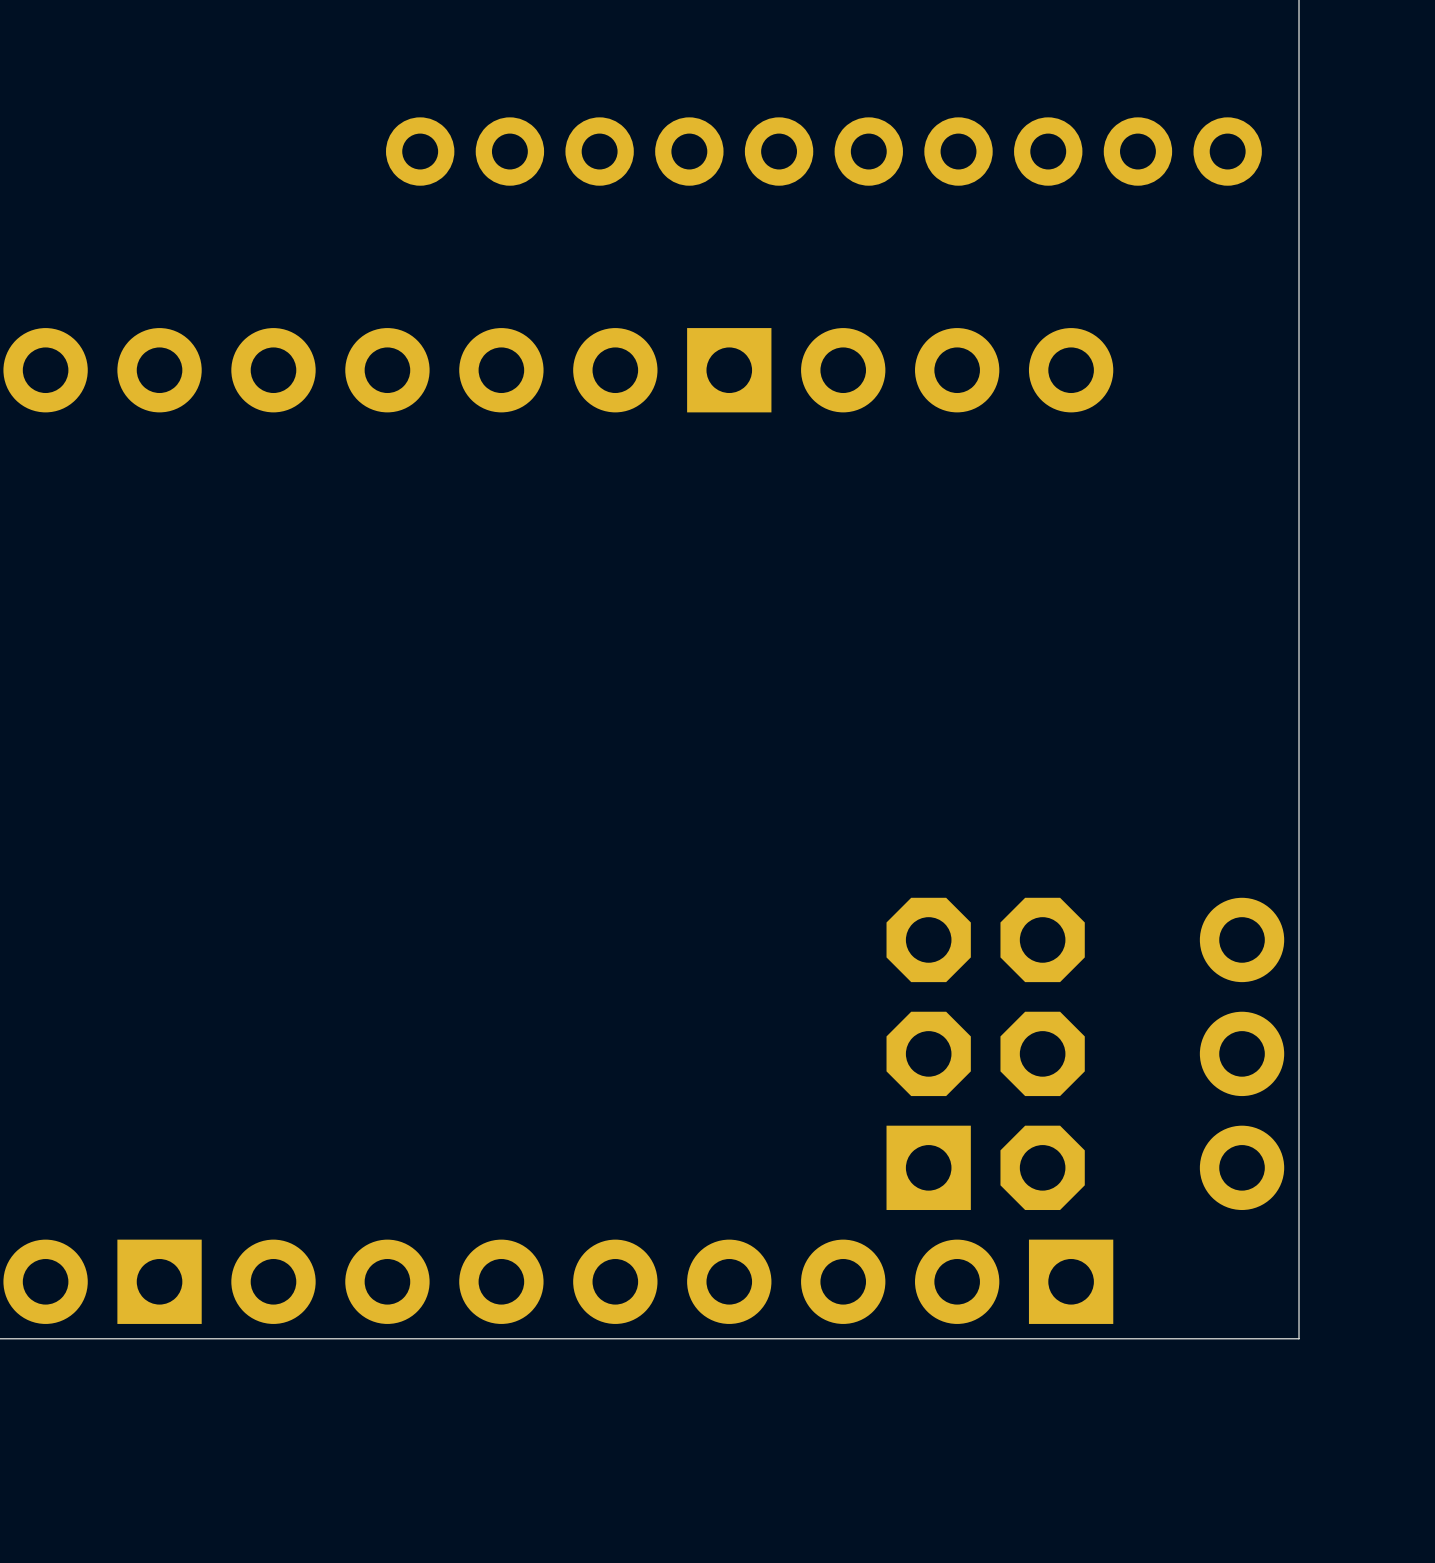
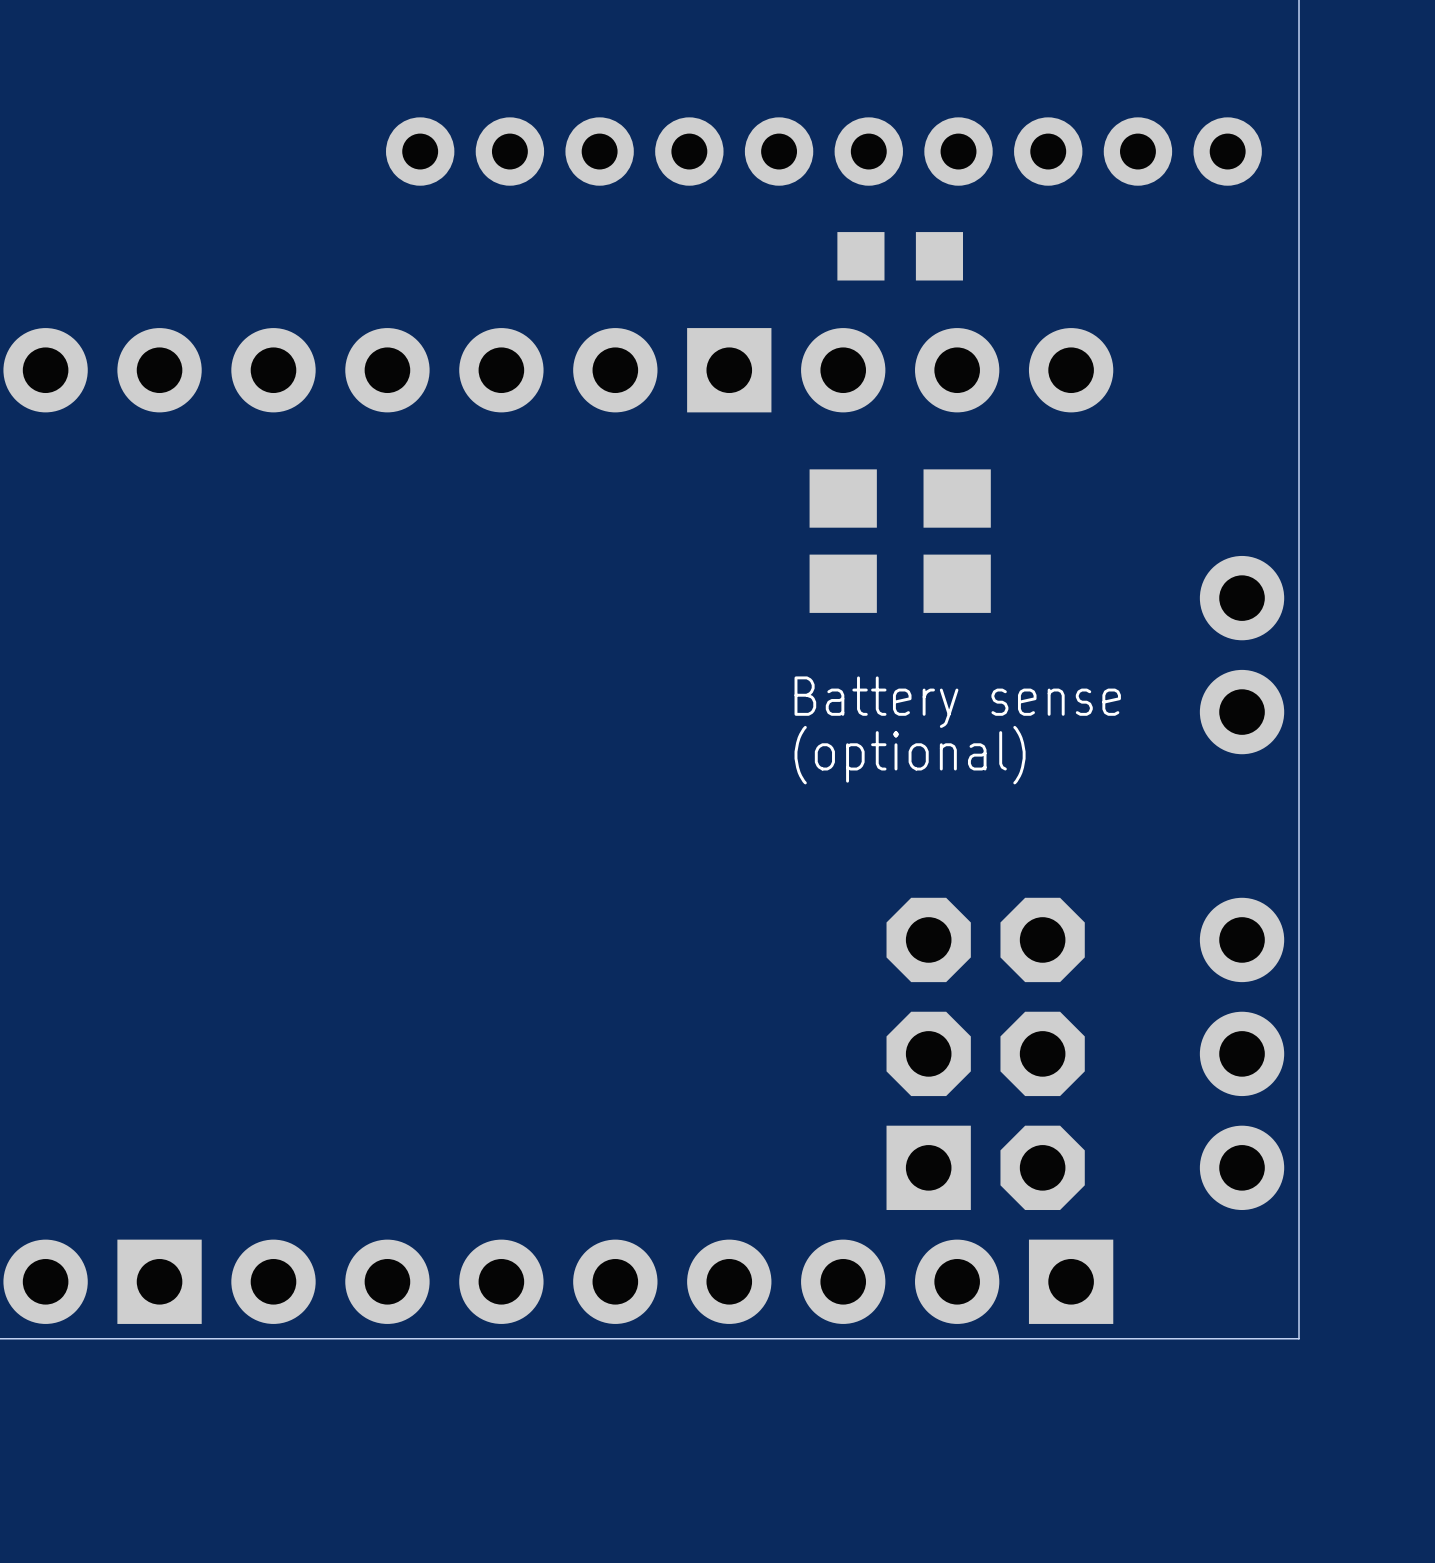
part: none -> (900, 256)
part: none -> (843, 541)
part: none -> (957, 541)
part: none -> (1242, 655)
text: none -> Battery sense (957, 702)
text: none -> (optional) (910, 755)

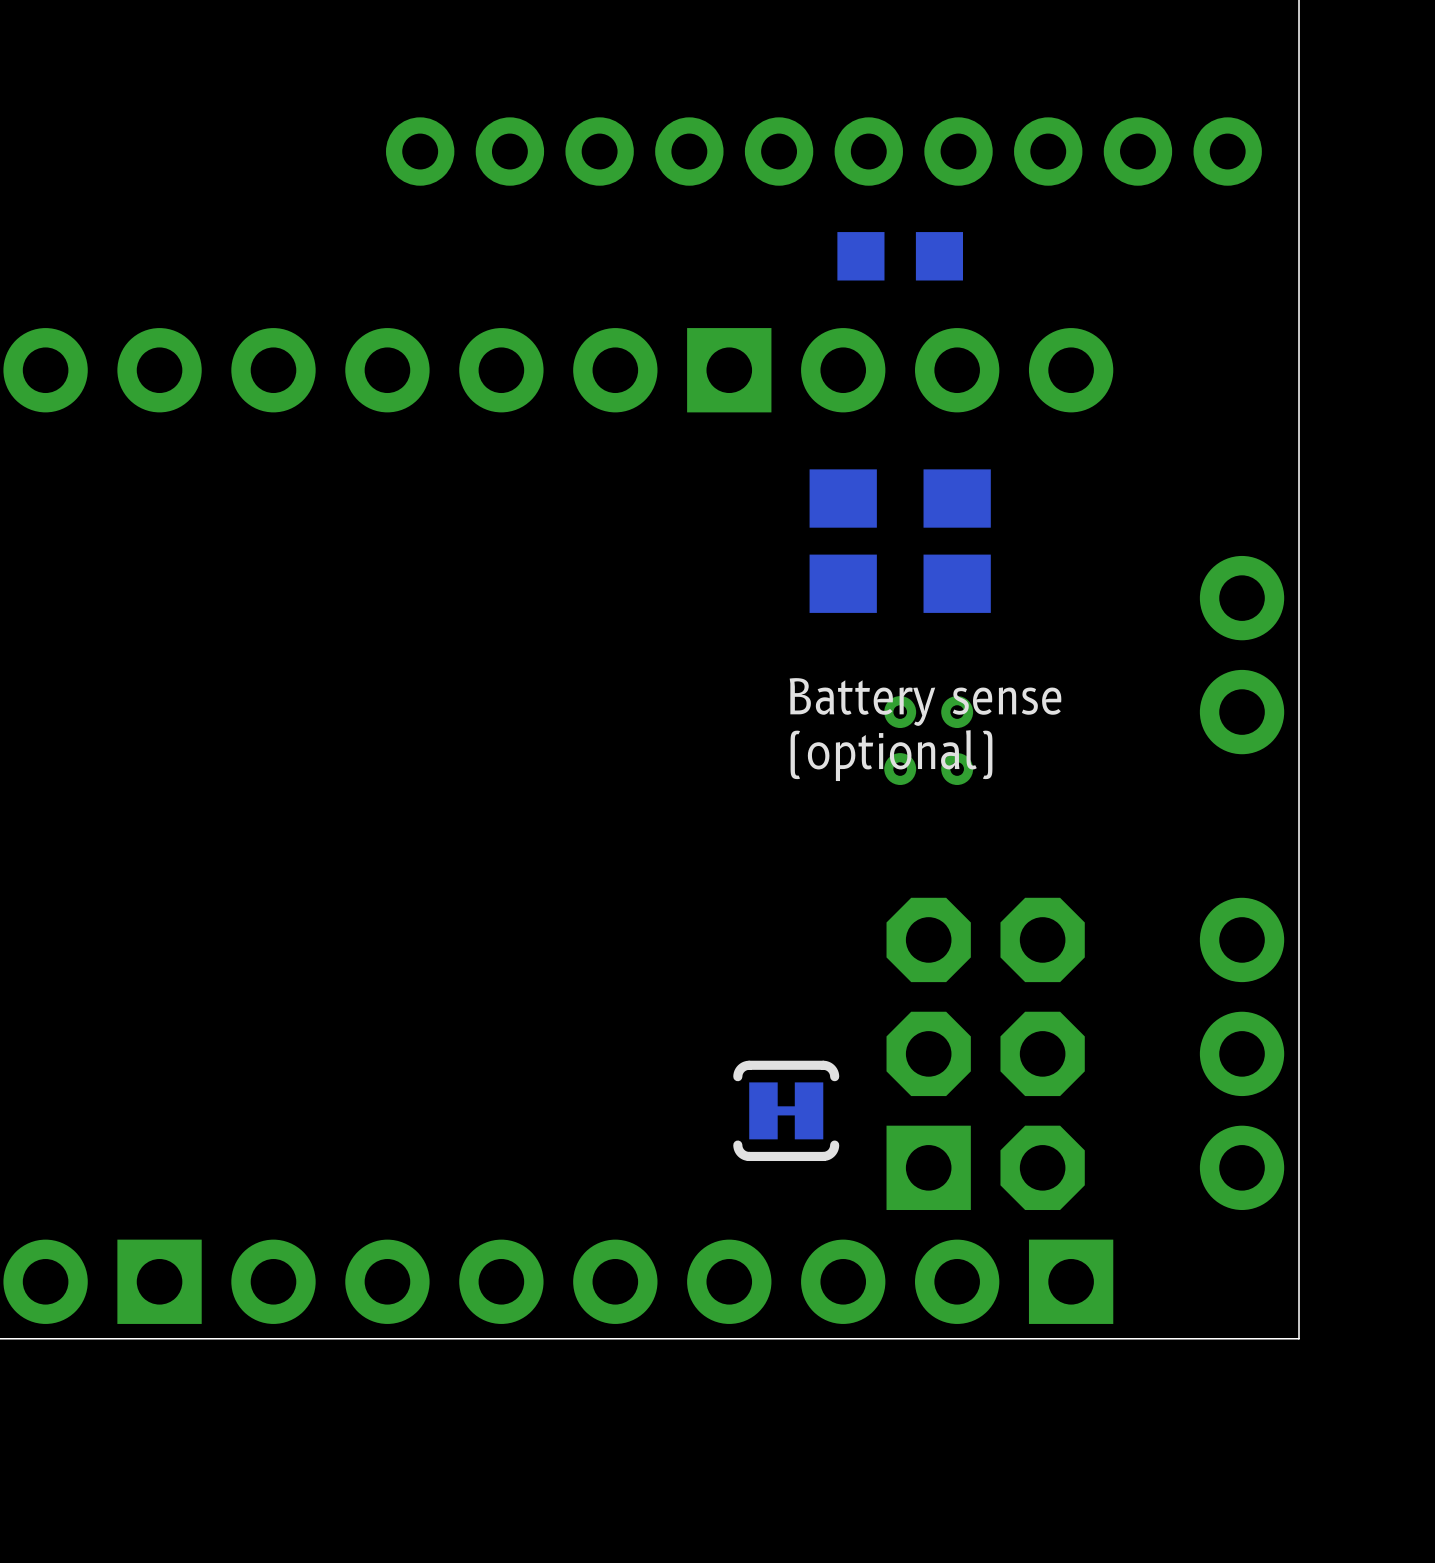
via: none -> (900, 712)
via: none -> (957, 712)
via: none -> (900, 769)
via: none -> (957, 769)
part: none -> (786, 1110)

